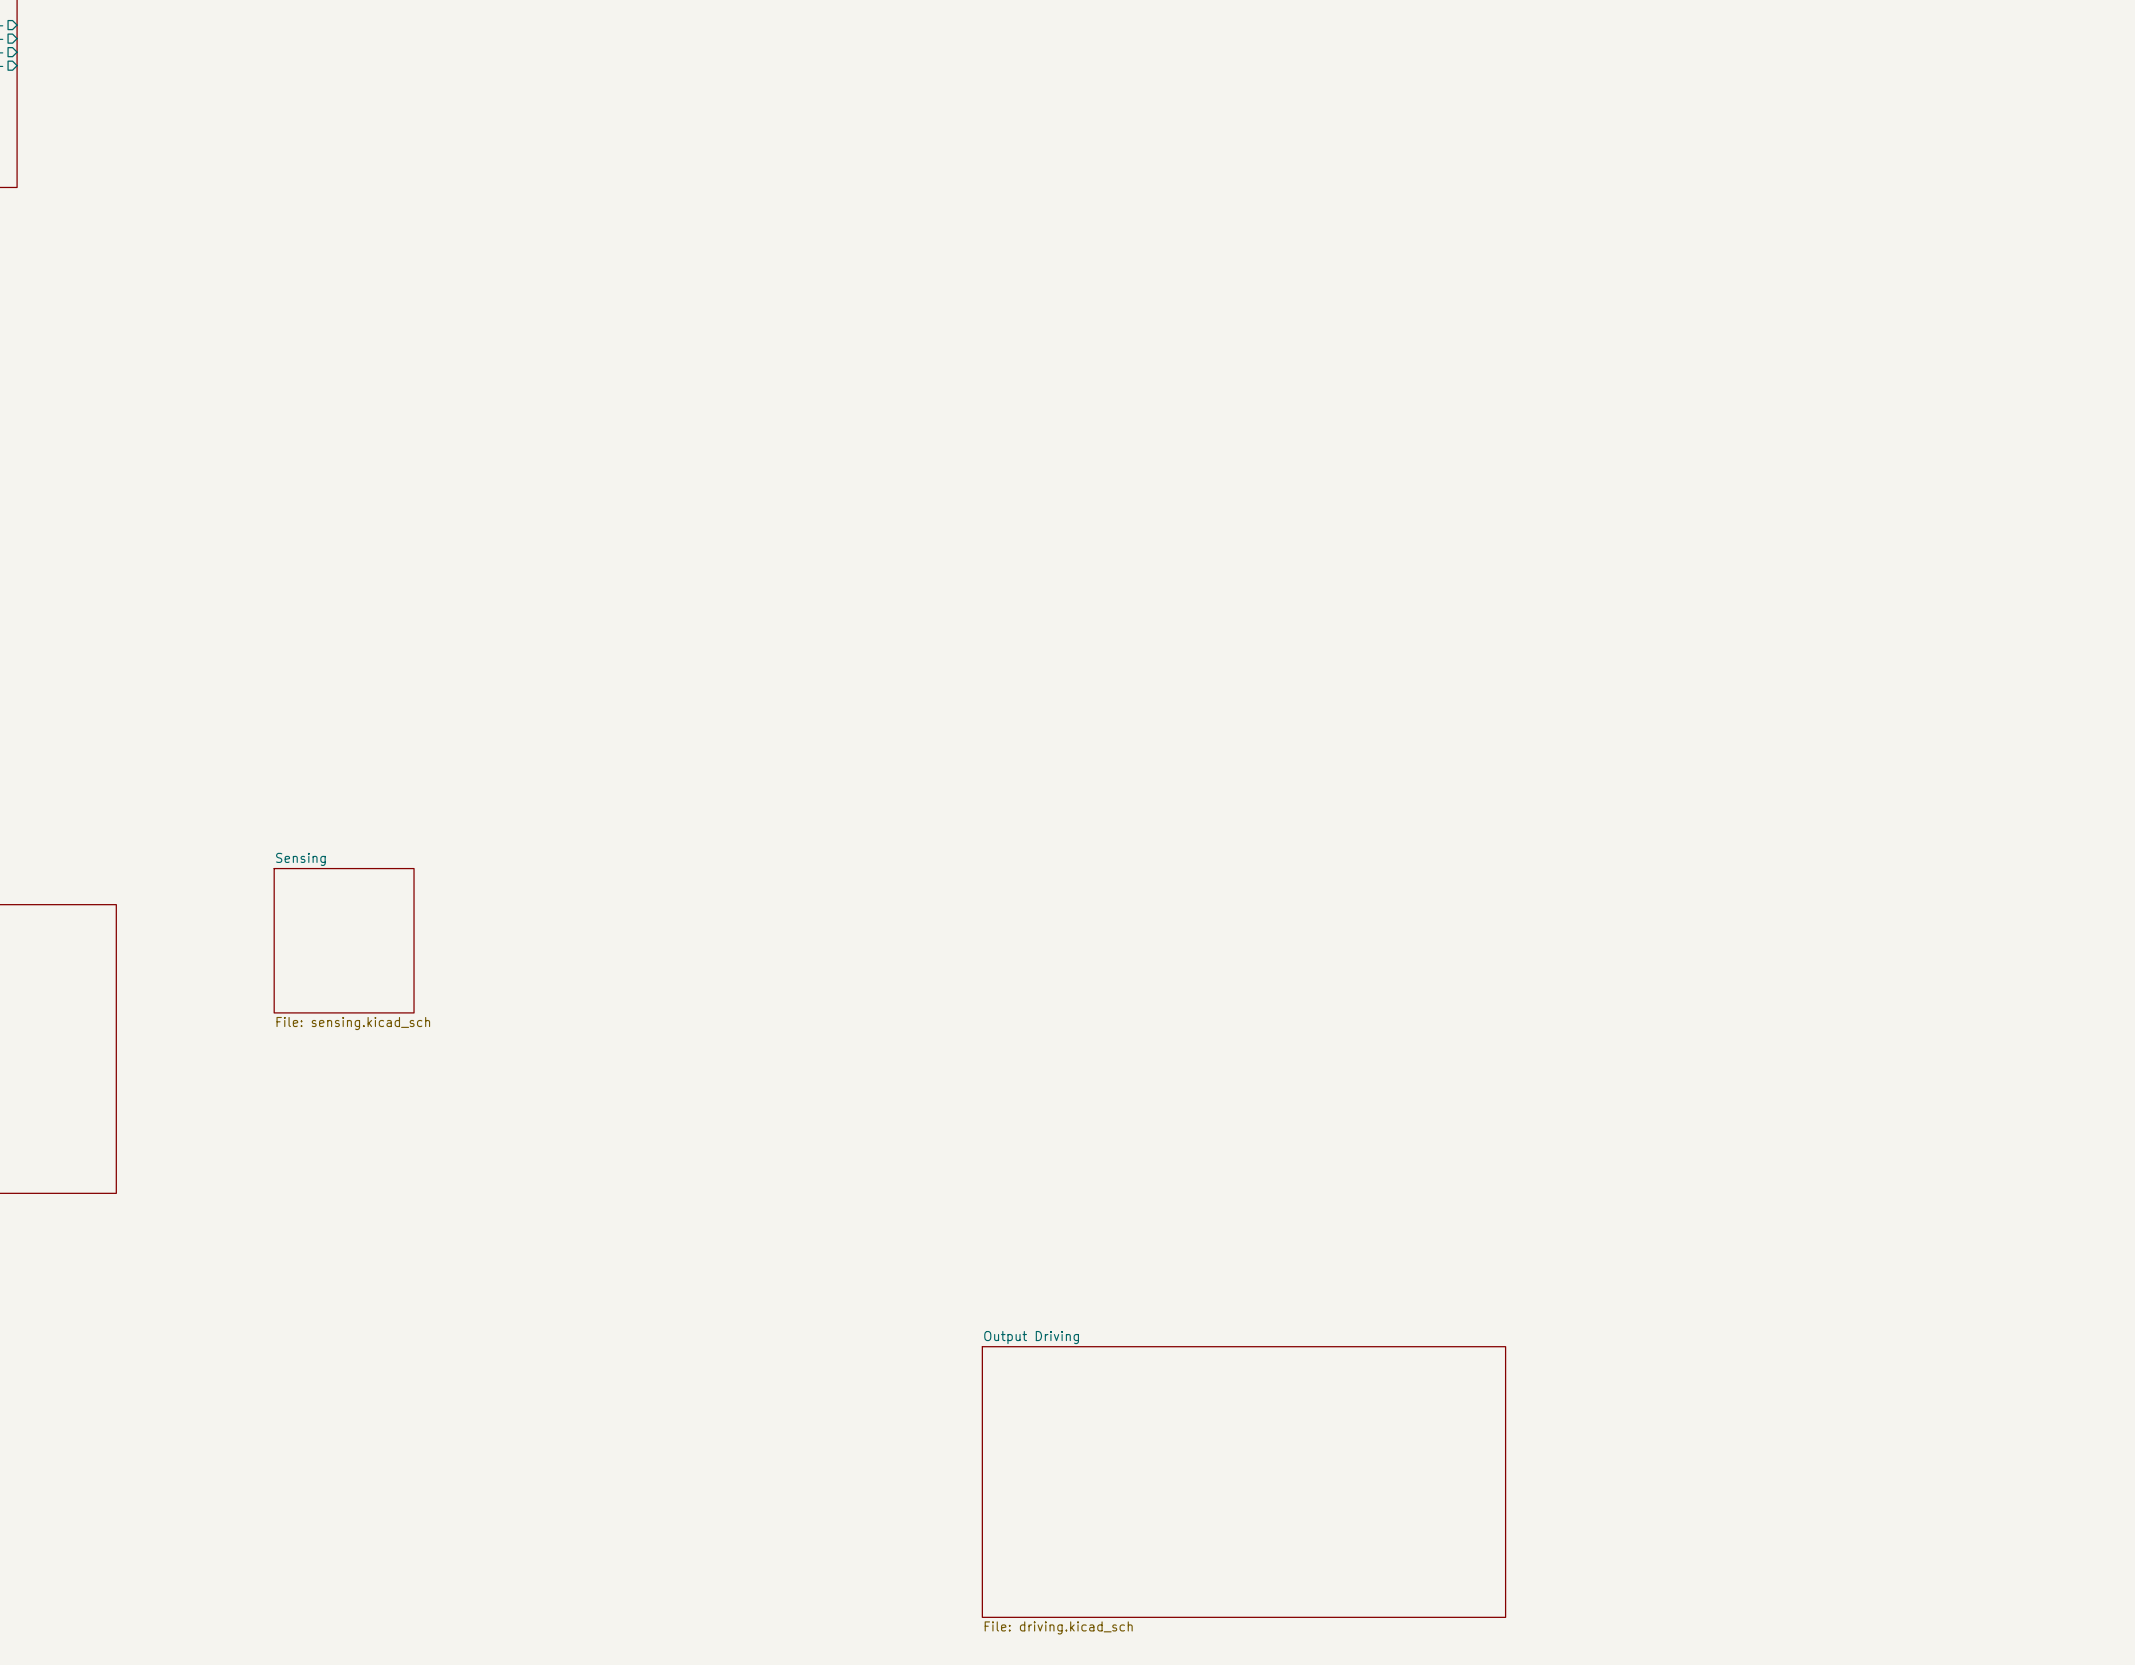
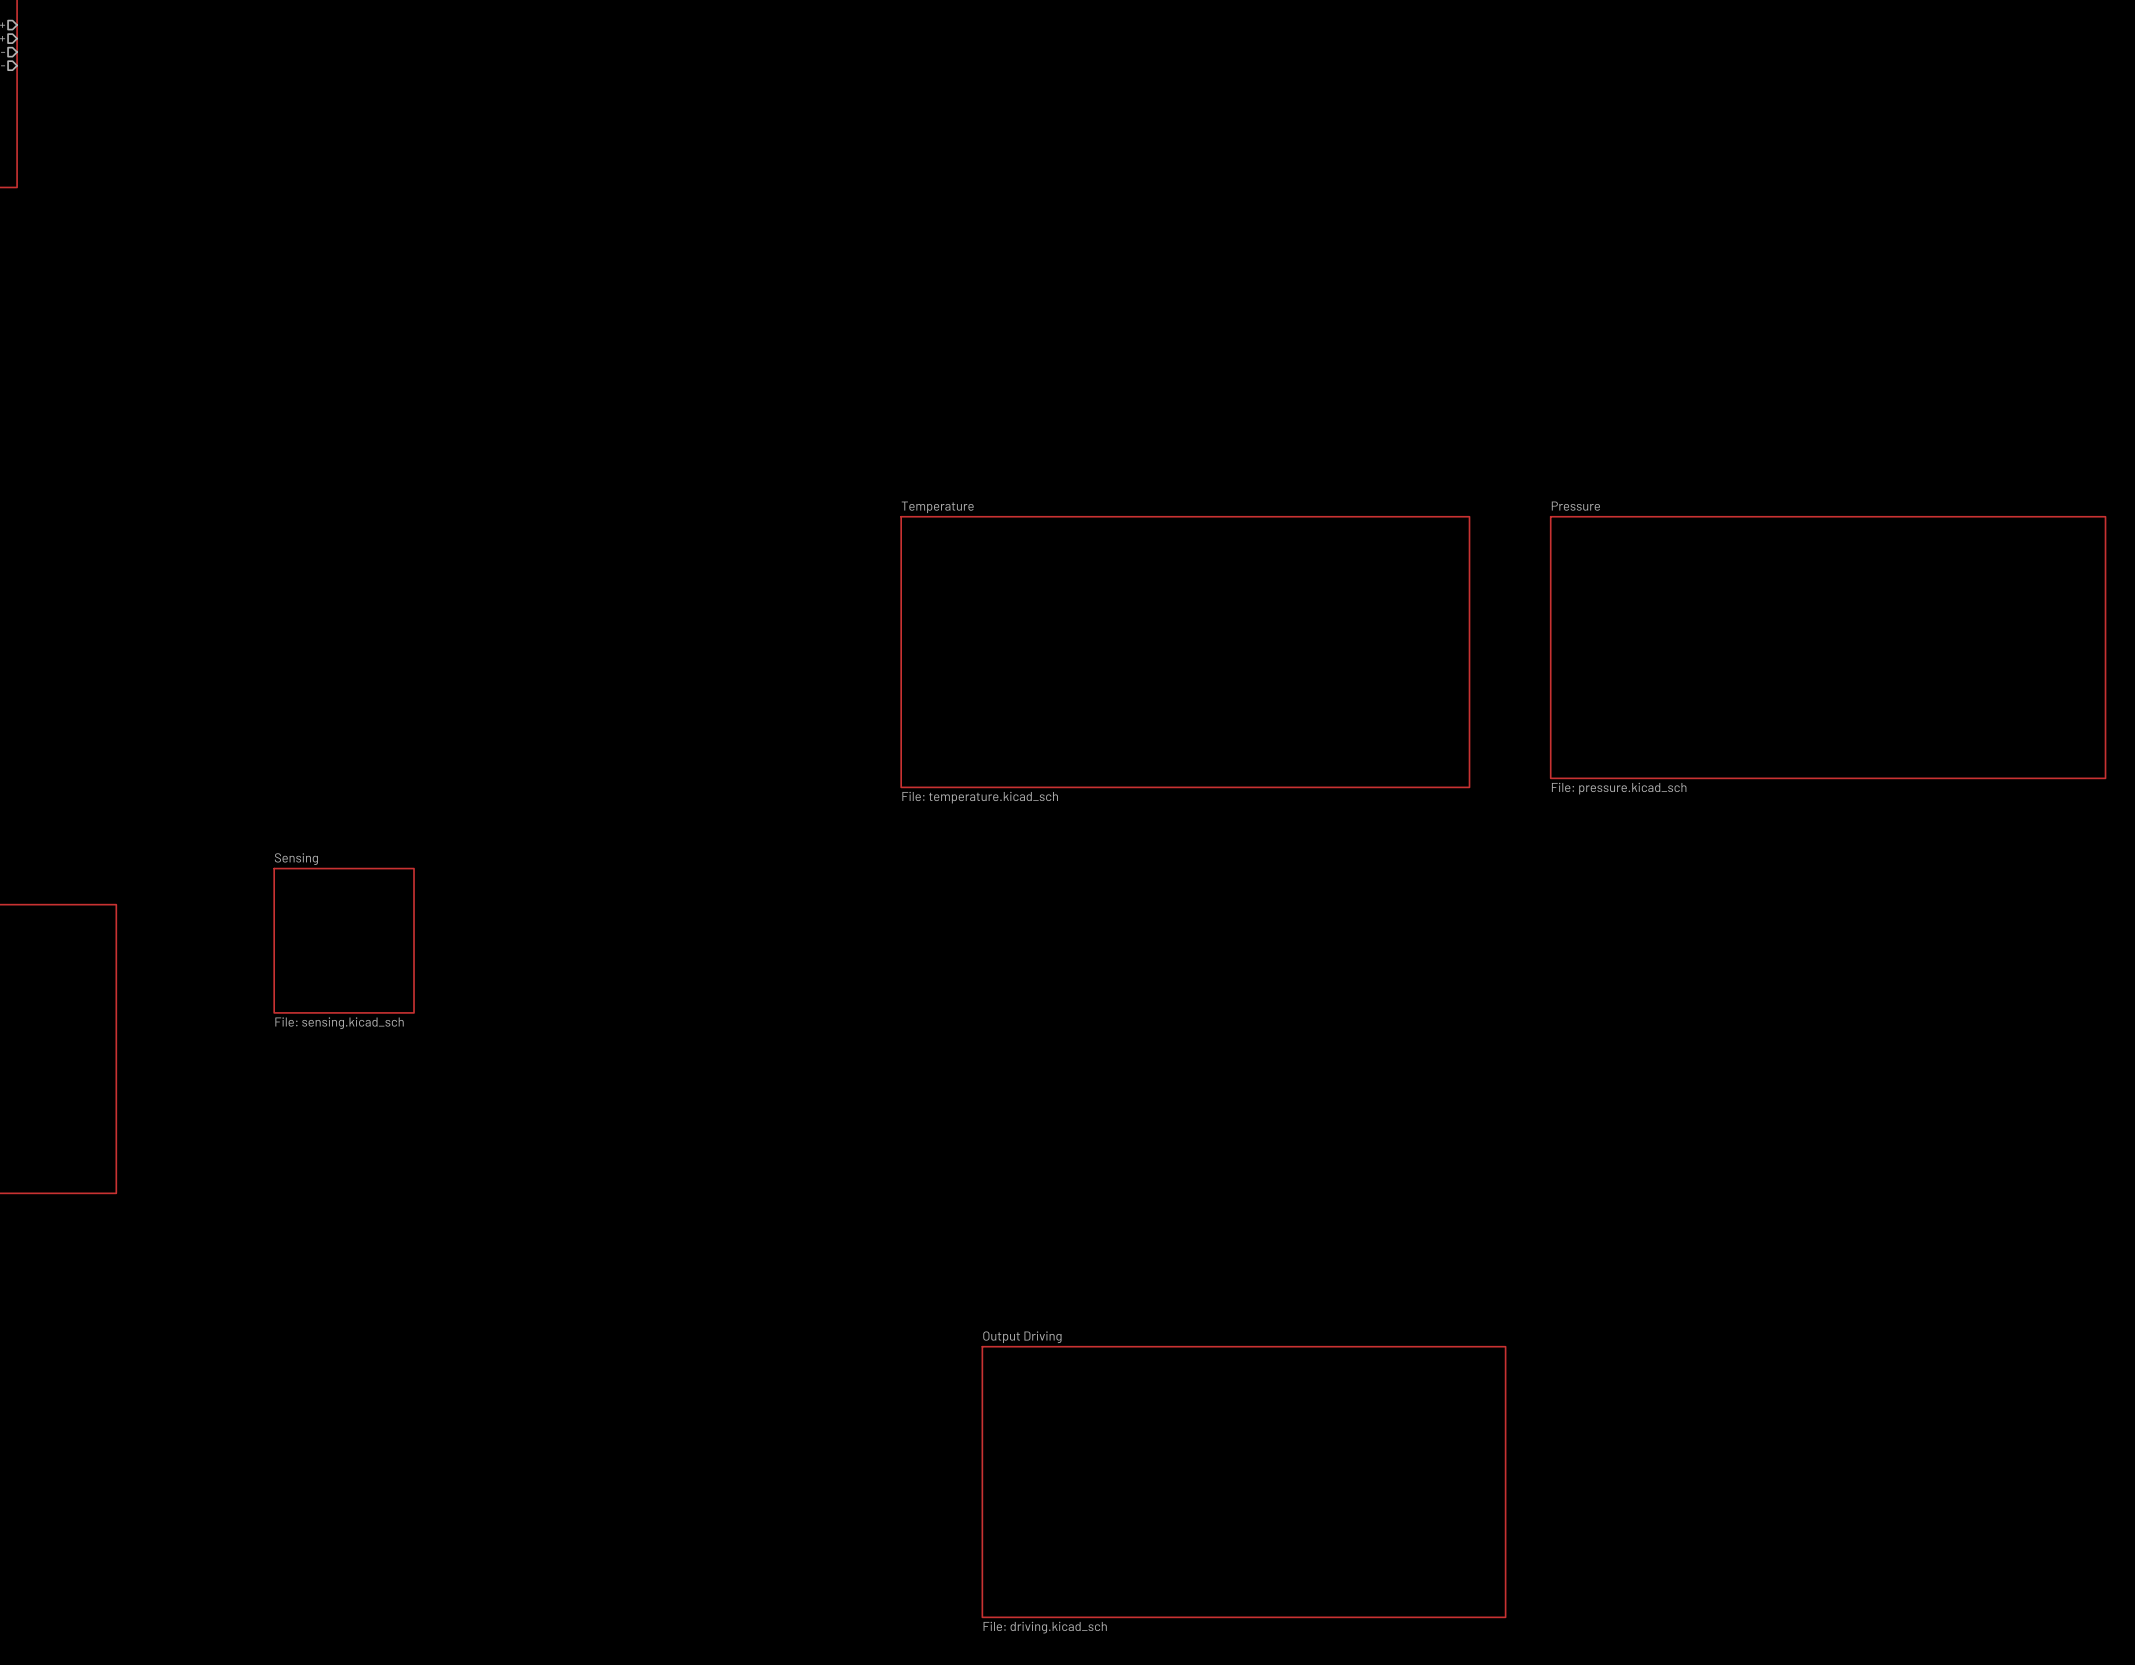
sheet Pressure: none -> File: pressure.kicad_sch (1828, 647)
sheet Temperature: none -> File: temperature.kicad_sch (1185, 652)

